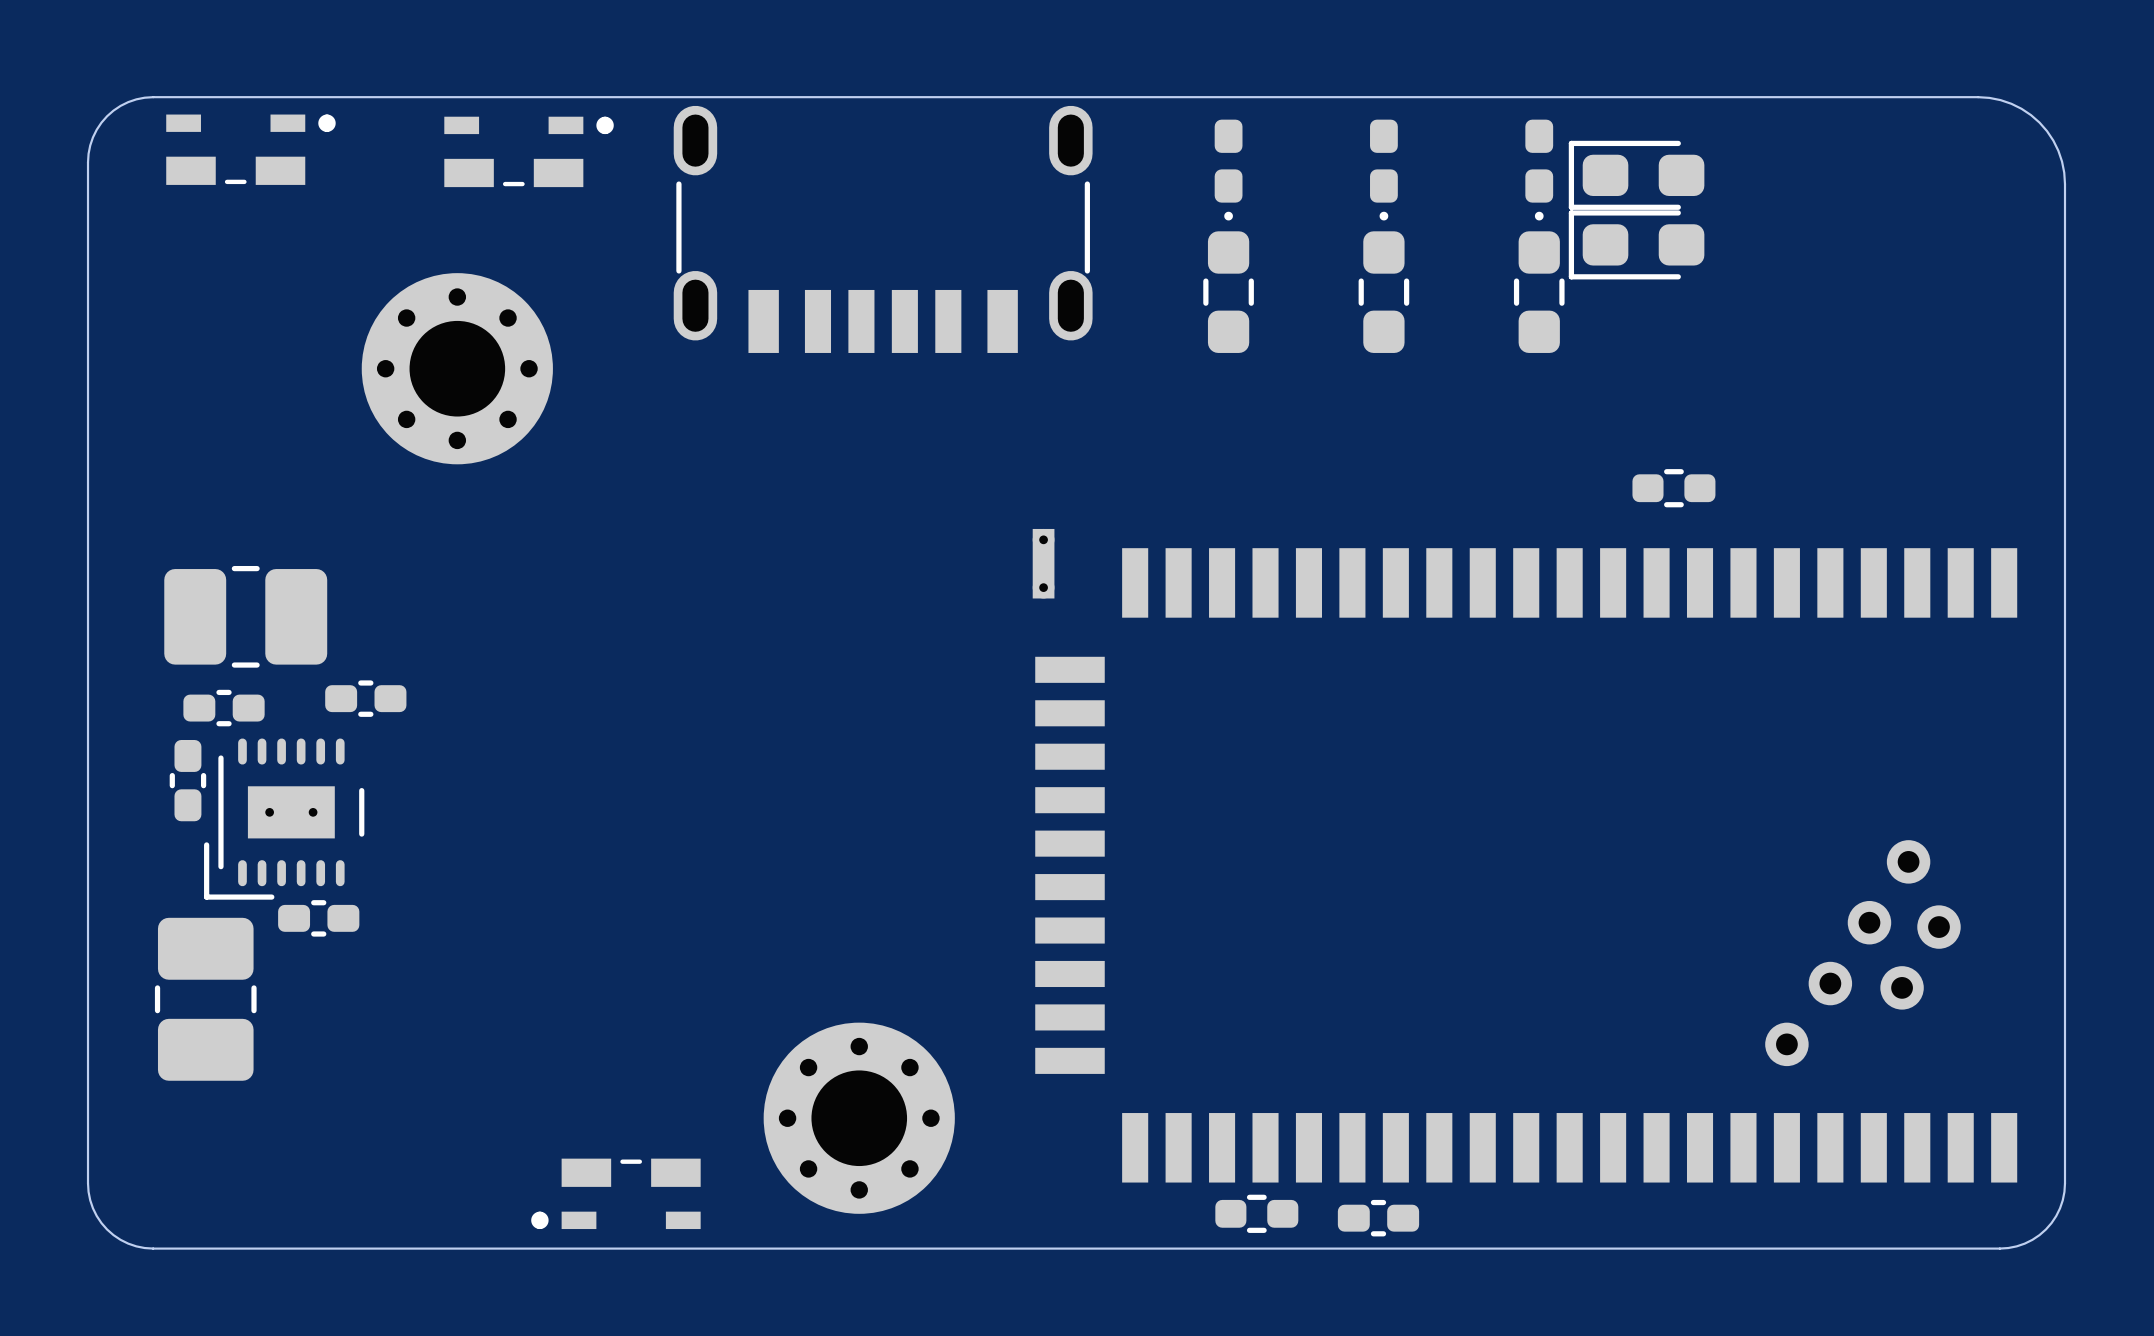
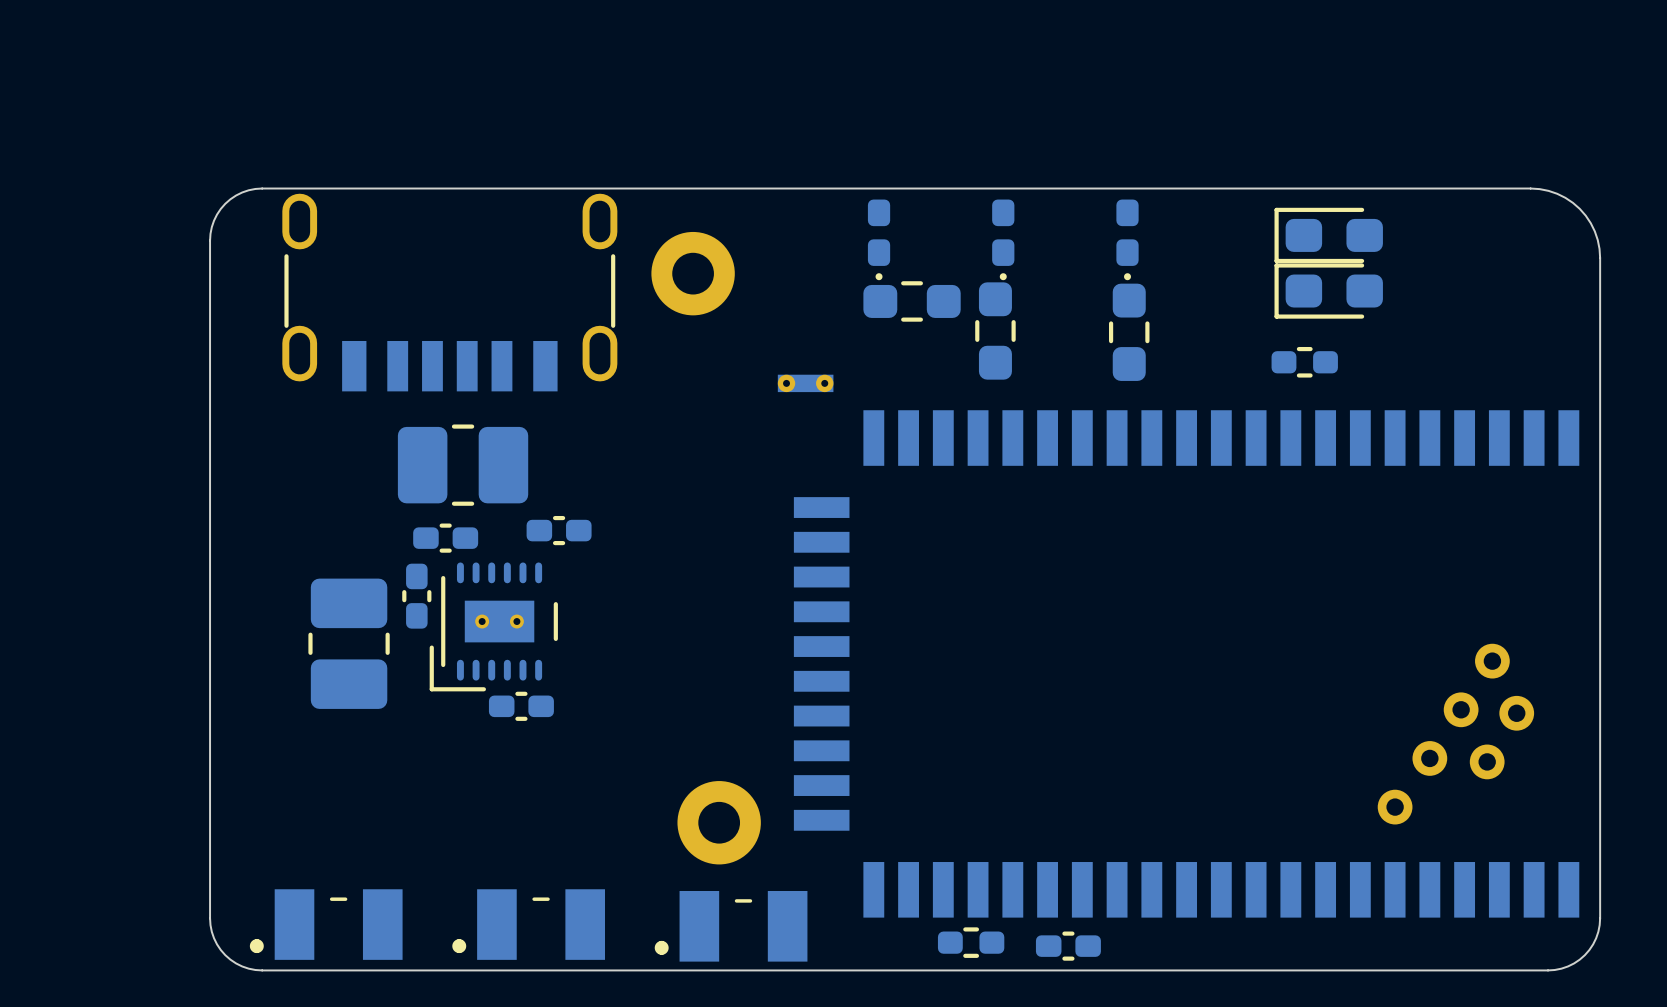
part: (250, 149) -> none
part: (529, 151) -> none
part: (1228, 170) -> none
part: (1383, 170) -> none
part: (1539, 170) -> none
part: (1636, 175) -> none
part position: (883, 229) -> (449, 292)
part: (1636, 244) -> none
part: (1228, 292) -> none
part: (1383, 292) -> none
part: (1539, 292) -> none
part: none -> (1328, 235)
part: none -> (879, 239)
part: none -> (1003, 239)
part: none -> (1127, 239)
part: (457, 368) -> none
part: none -> (693, 273)
part: none -> (1328, 291)
part: none -> (912, 301)
part: none -> (995, 330)
part: none -> (1129, 332)
part rotation: 0° (1043, 563) -> 90° clockwise (805, 383)
part position: (1043, 563) -> (805, 383)
part: (245, 616) -> none
part: none -> (463, 465)
part: (365, 698) -> none
part: none -> (559, 530)
part: (224, 708) -> none
part: none -> (445, 538)
part: (187, 780) -> none
part: none -> (416, 596)
part position: (284, 819) -> (493, 626)
part: none -> (349, 643)
part: (318, 918) -> none
part: none -> (521, 706)
part: (205, 999) -> none
part: none -> (719, 822)
part: (859, 1118) -> none
part: none -> (326, 924)
part: none -> (528, 924)
part: (615, 1193) -> none
part: none -> (731, 926)
board edge: (1978, 1248) (2016, 1246) (2039, 1235) (2051, 1223) (2060, 1208) (2065, 1183) (2065, 184) (2062, 161) (2053, 140) (2039, 122) (2021, 108) (2000, 100) (1978, 97) (153, 97) (136, 99) (113, 110) (101, 122) (92, 137) (88, 162) (88, 1183) (90, 1200) (101, 1223) (113, 1235) (128, 1243) (144, 1248) (370, 1248) -> (1548, 970) (1567, 966) (1579, 959) (1593, 944) (1599, 925) (1600, 258) (1594, 231) (1579, 208) (1557, 193) (1530, 188) (262, 188) (248, 190) (236, 195) (225, 203) (217, 214) (211, 227) (210, 240) (210, 918) (214, 938) (225, 955) (242, 966) (262, 970)

